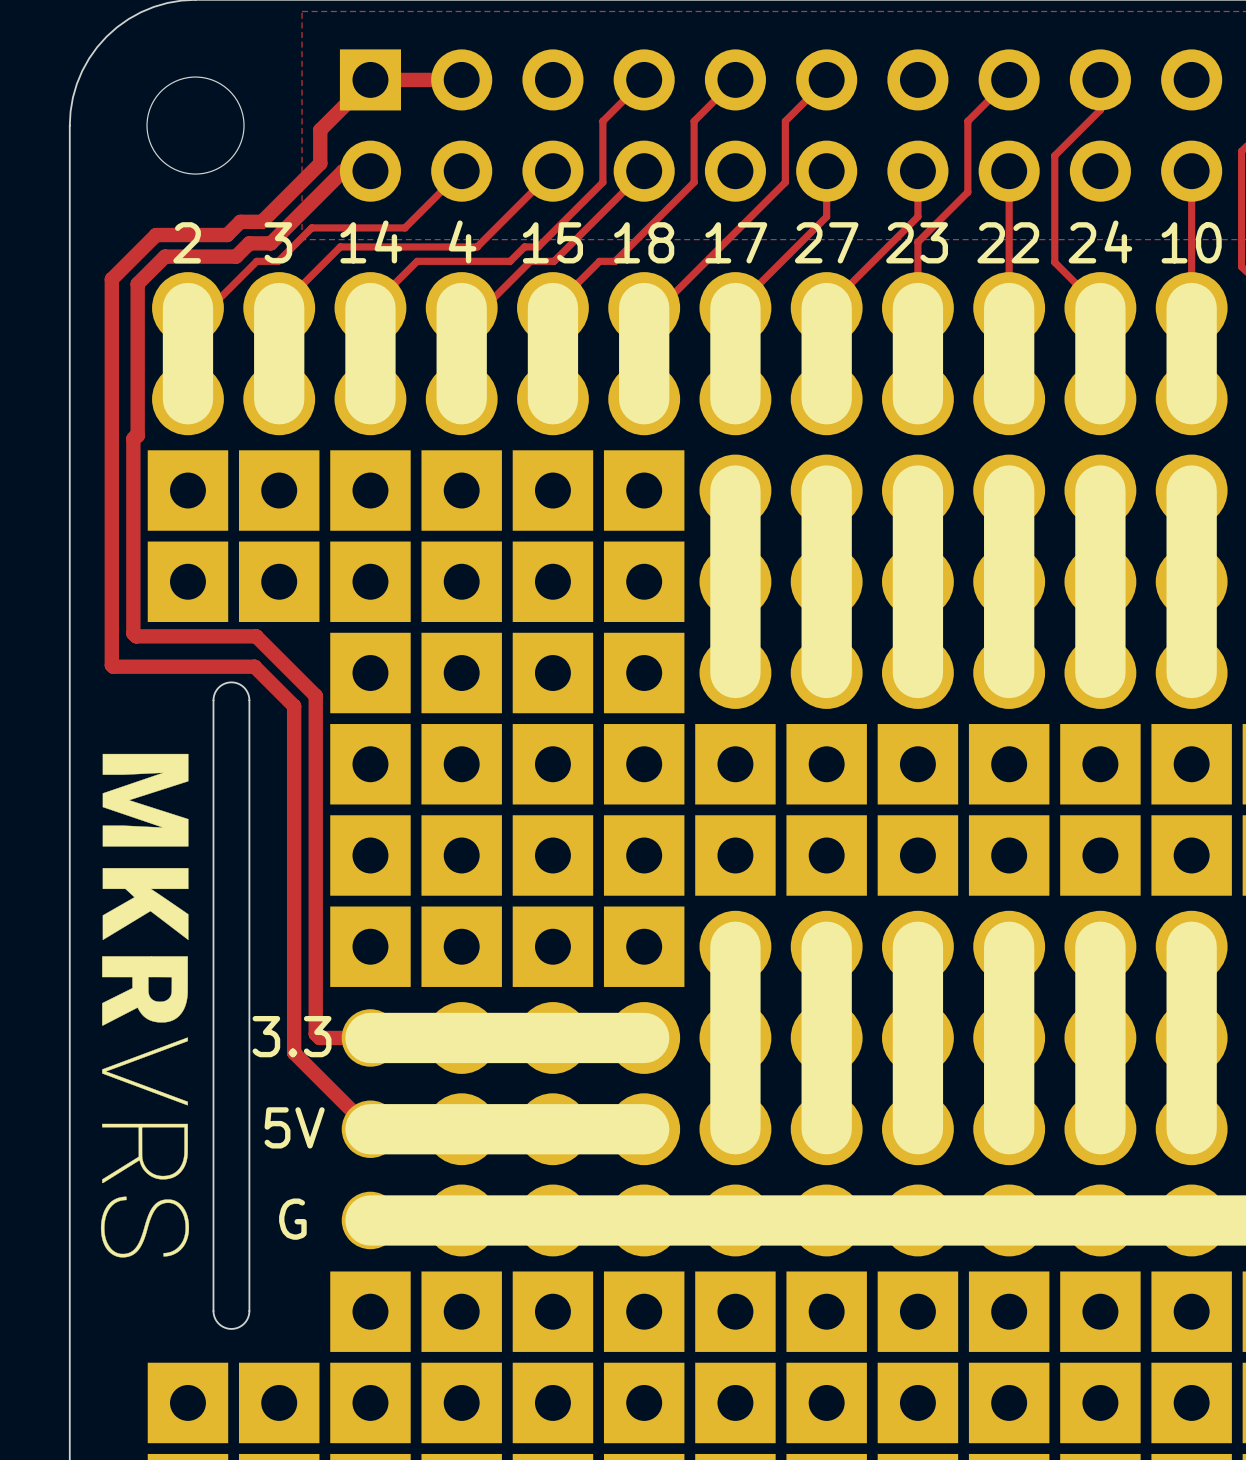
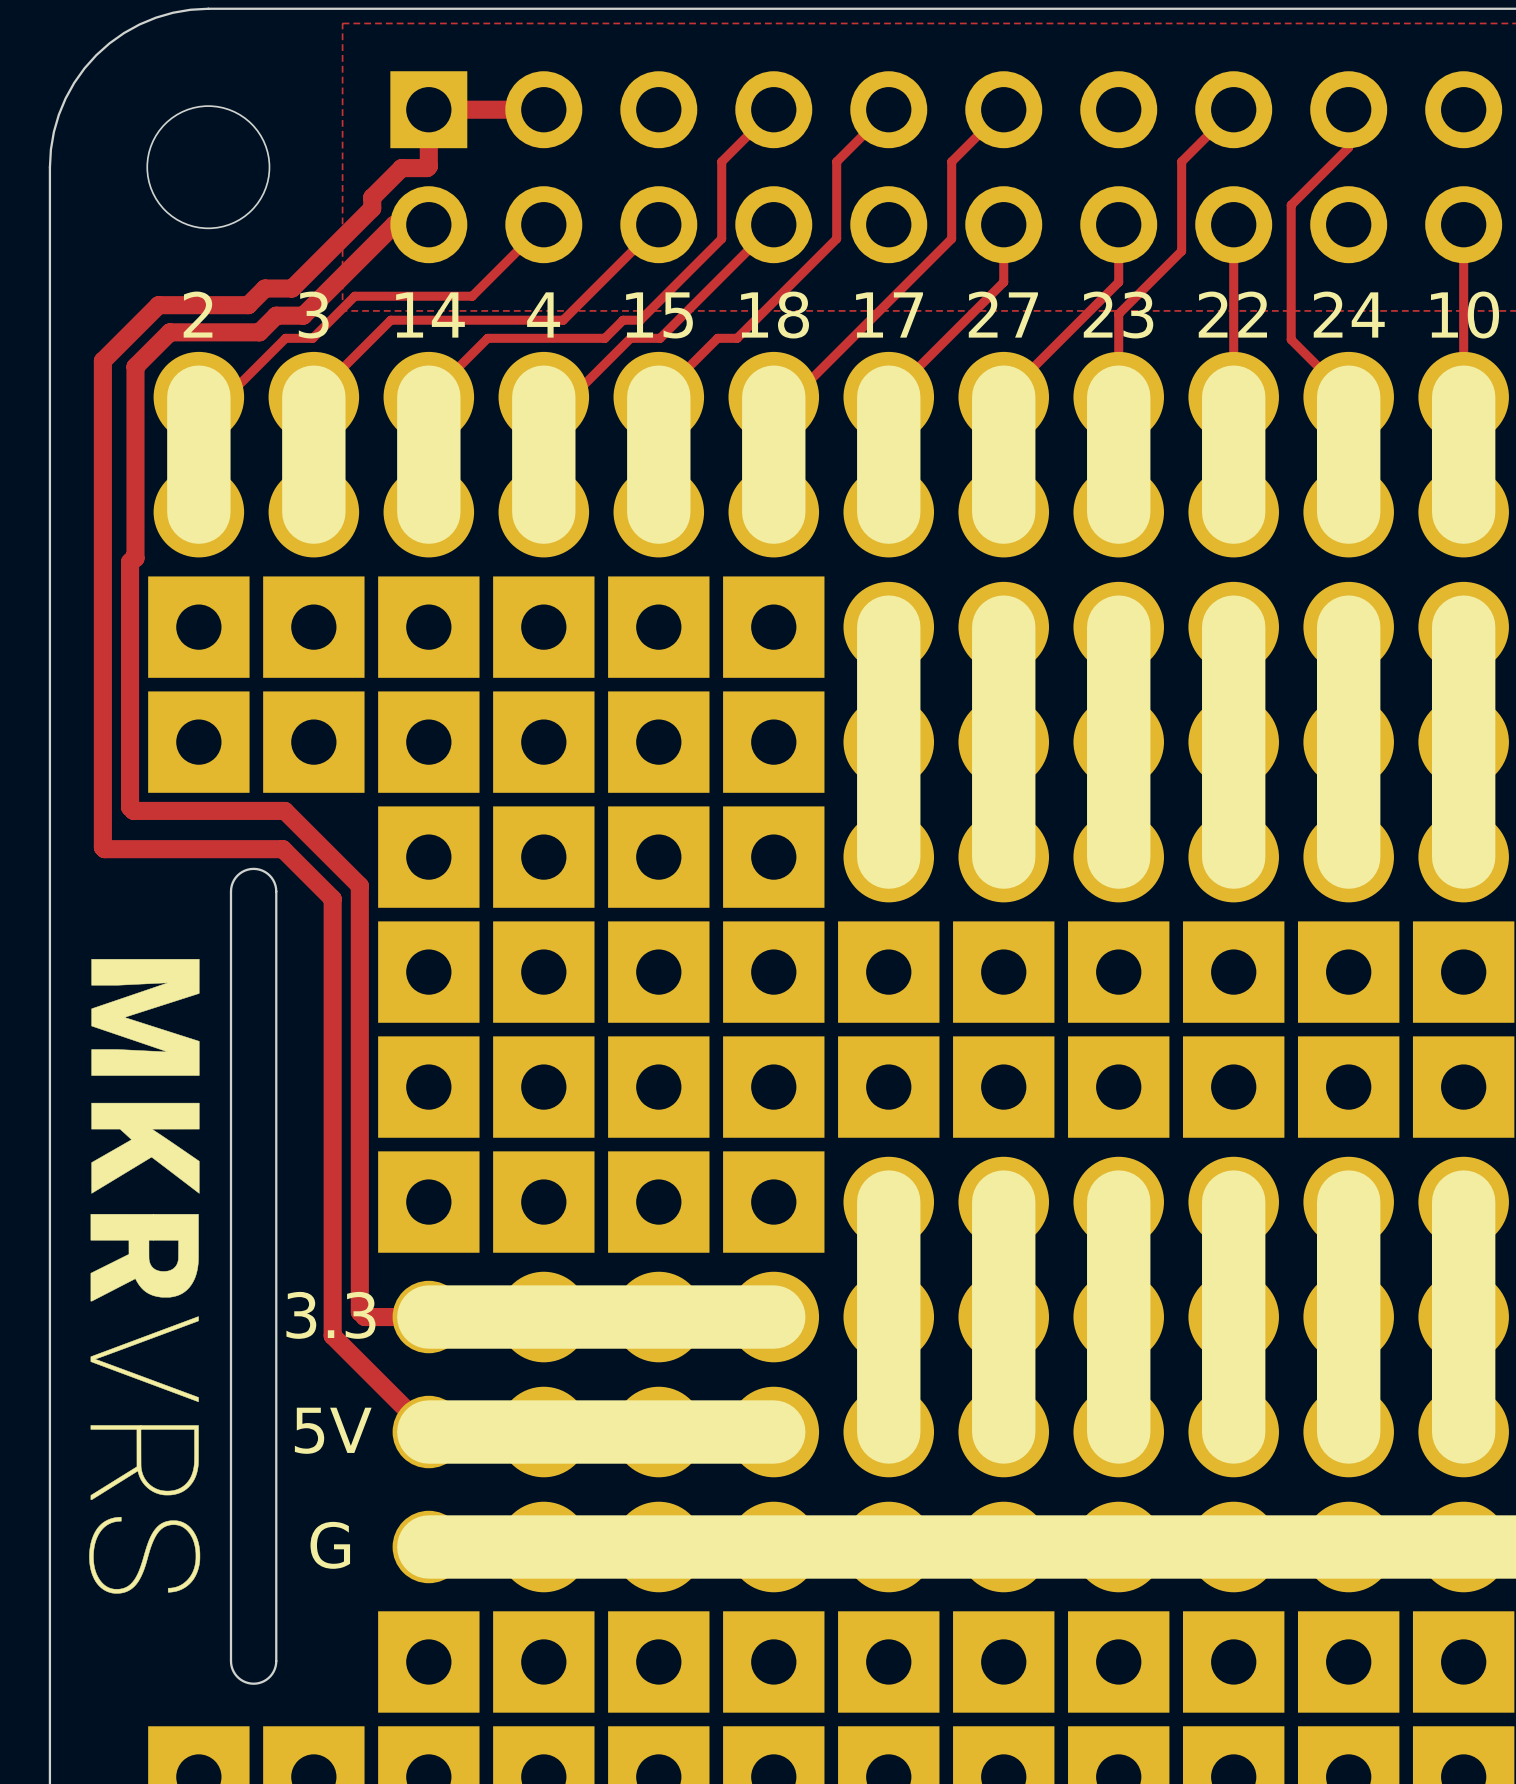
track: (370, 79) (320, 130) (320, 163) -> (428, 109) (428, 166) (427, 168) (401, 168) (372, 197) (372, 208) (365, 215)

